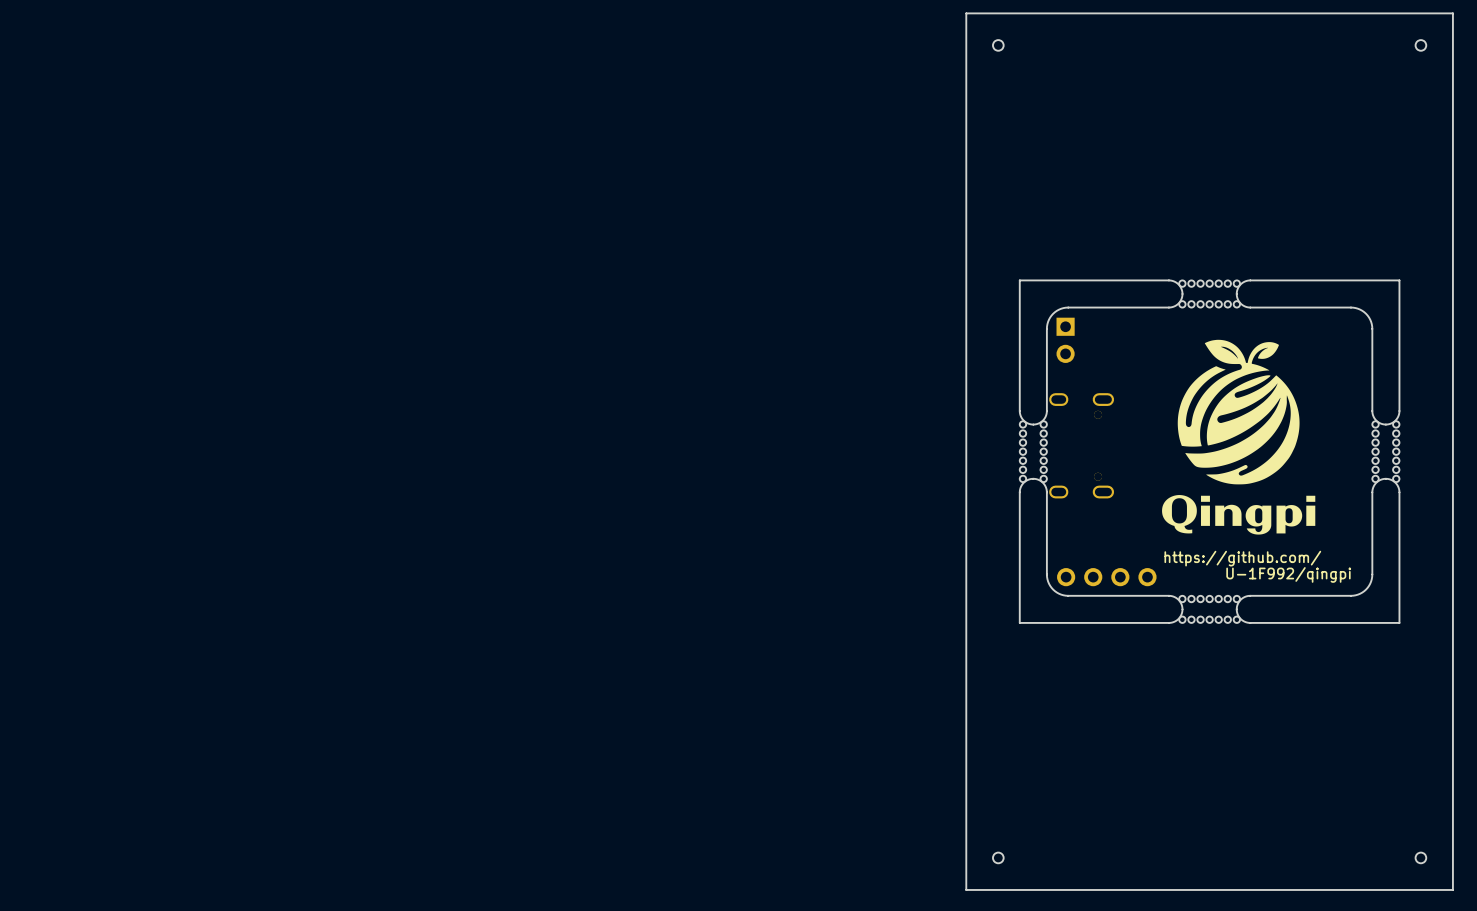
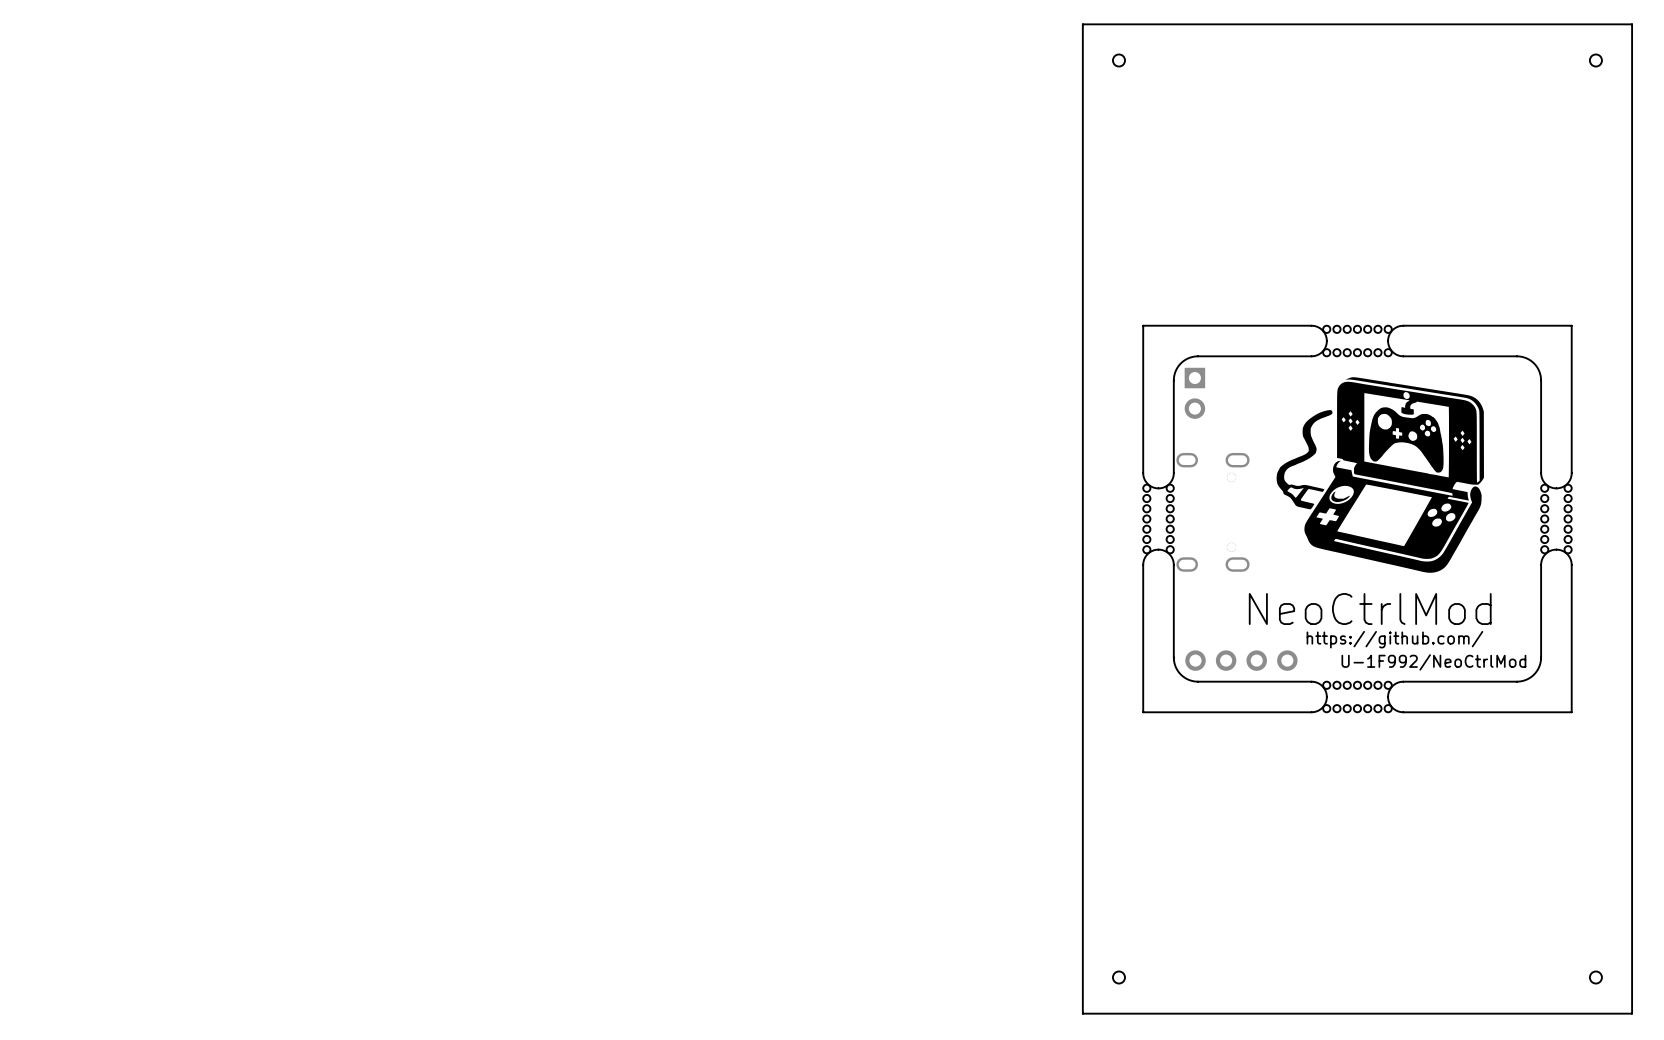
drawing: none -> [1276, 377, 1484, 573]
drawing: [1162, 339, 1316, 535] -> none
text: none -> NeoCtrlMod (1370, 609)
text: U-1F992/qingpi (1288, 574) -> U-1F992/NeoCtrlMod (1433, 662)

